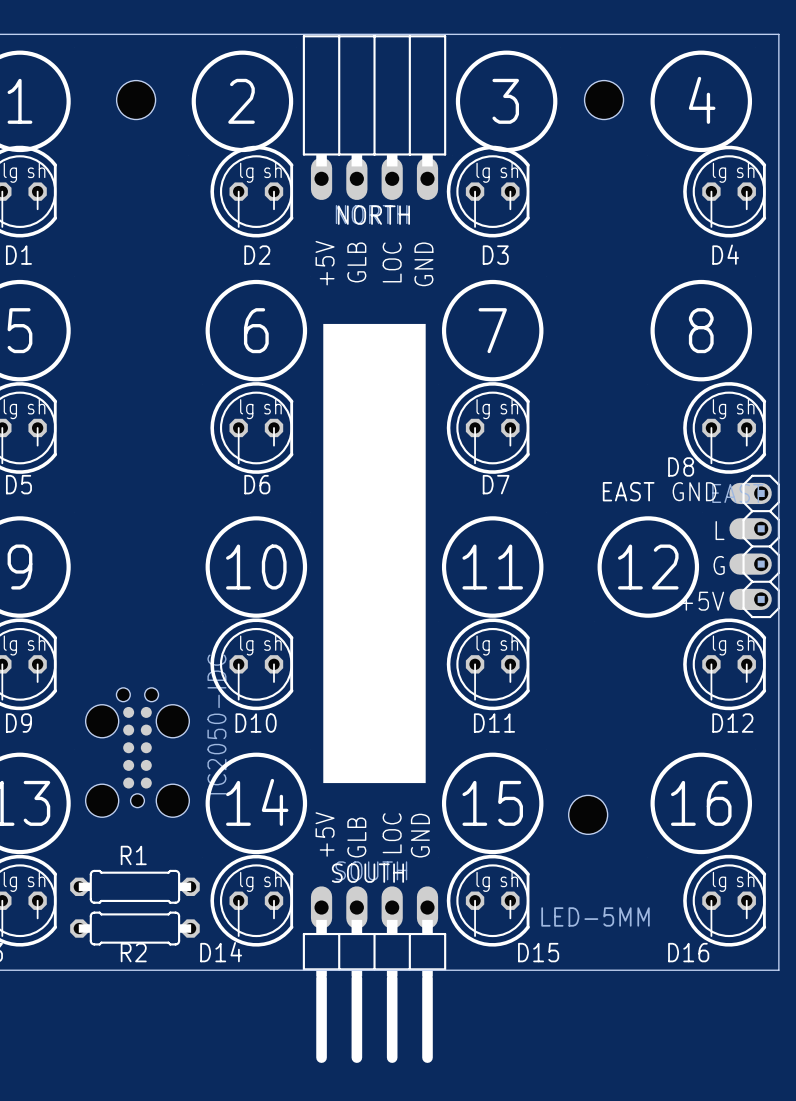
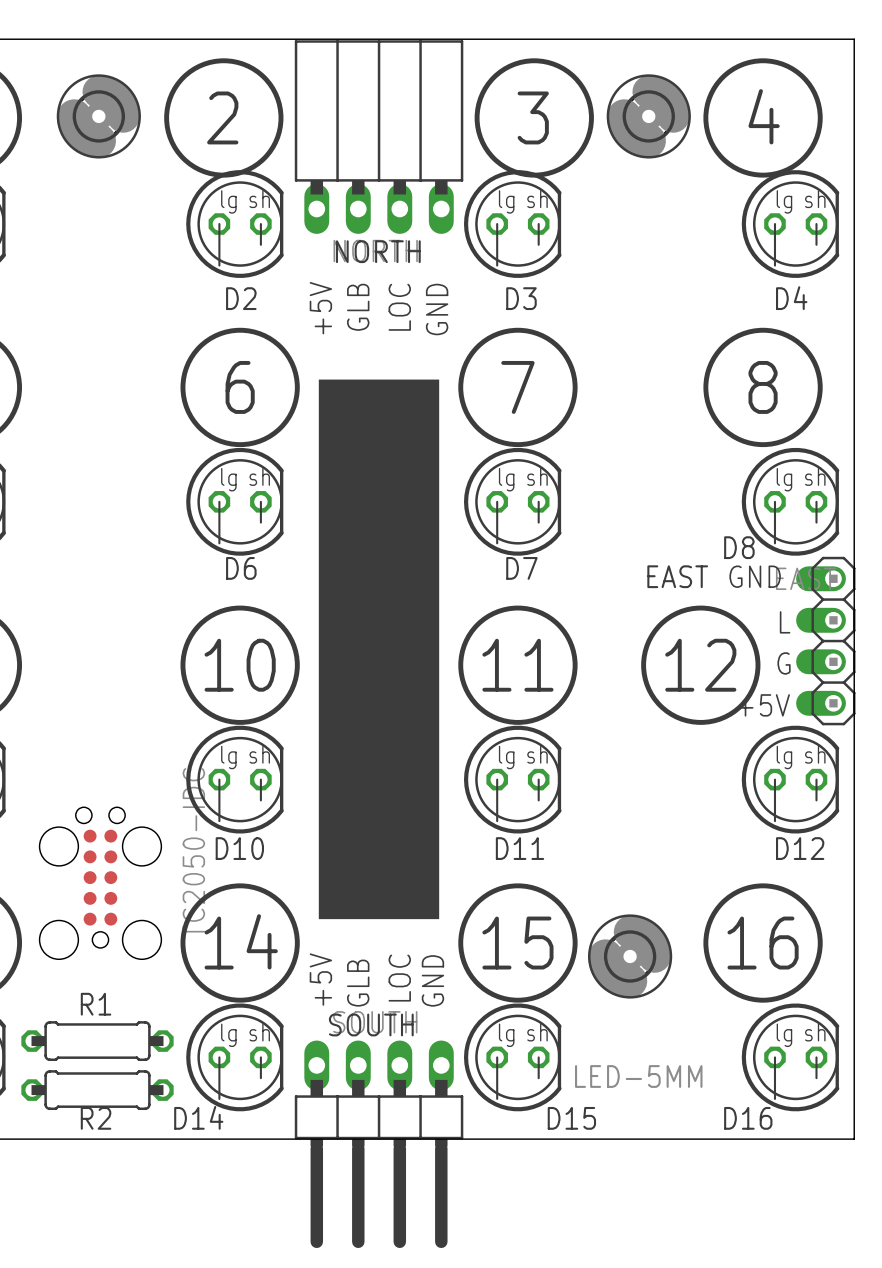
part side: bottom (136, 100) -> top (98, 116)
part side: bottom (604, 100) -> top (648, 116)
part side: bottom (588, 814) -> top (630, 956)

